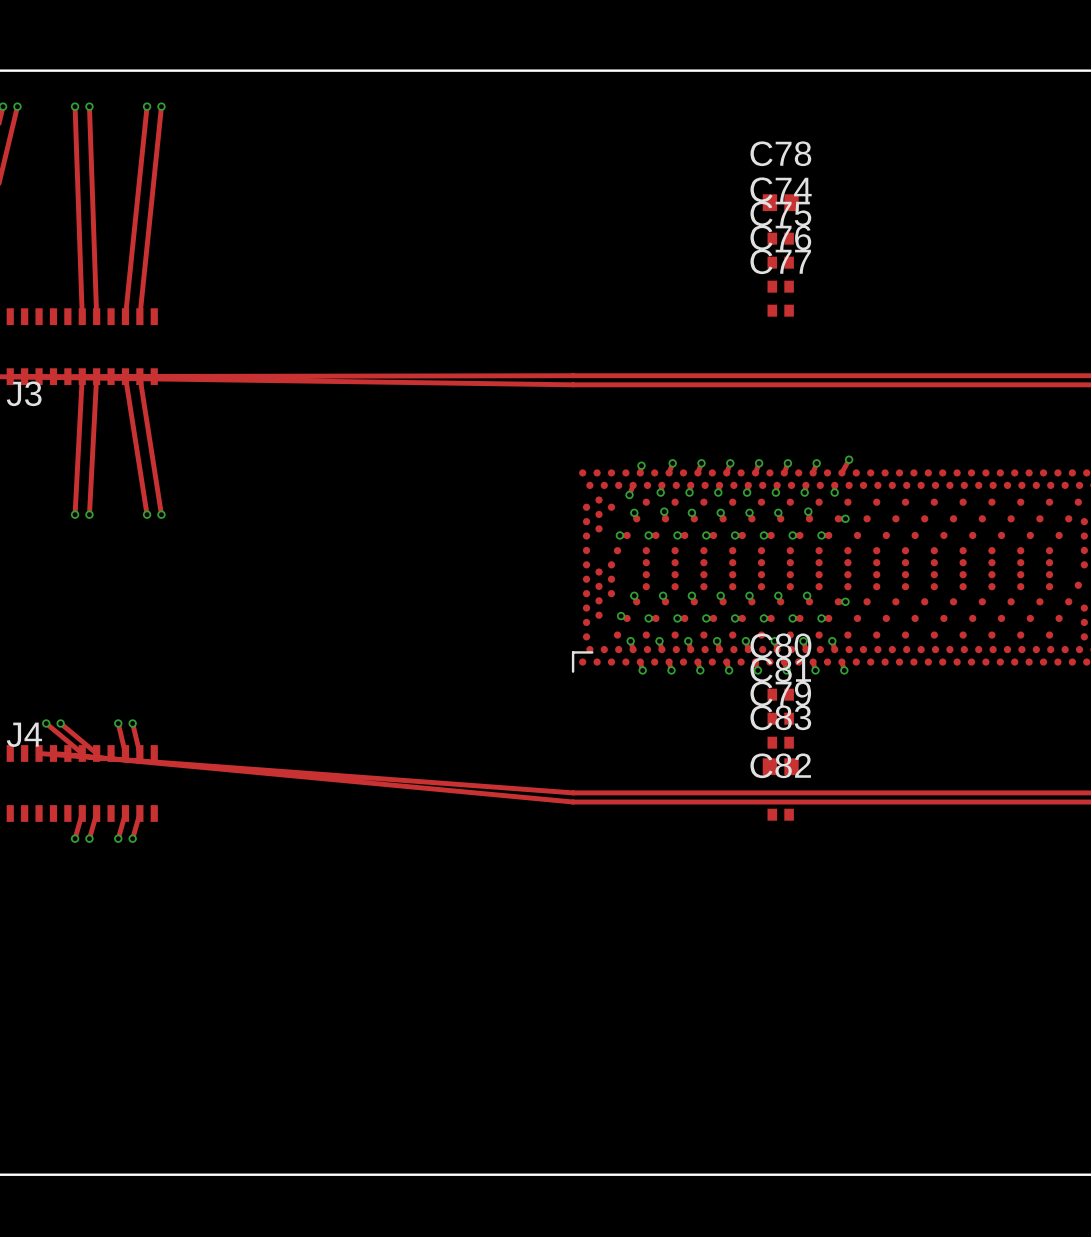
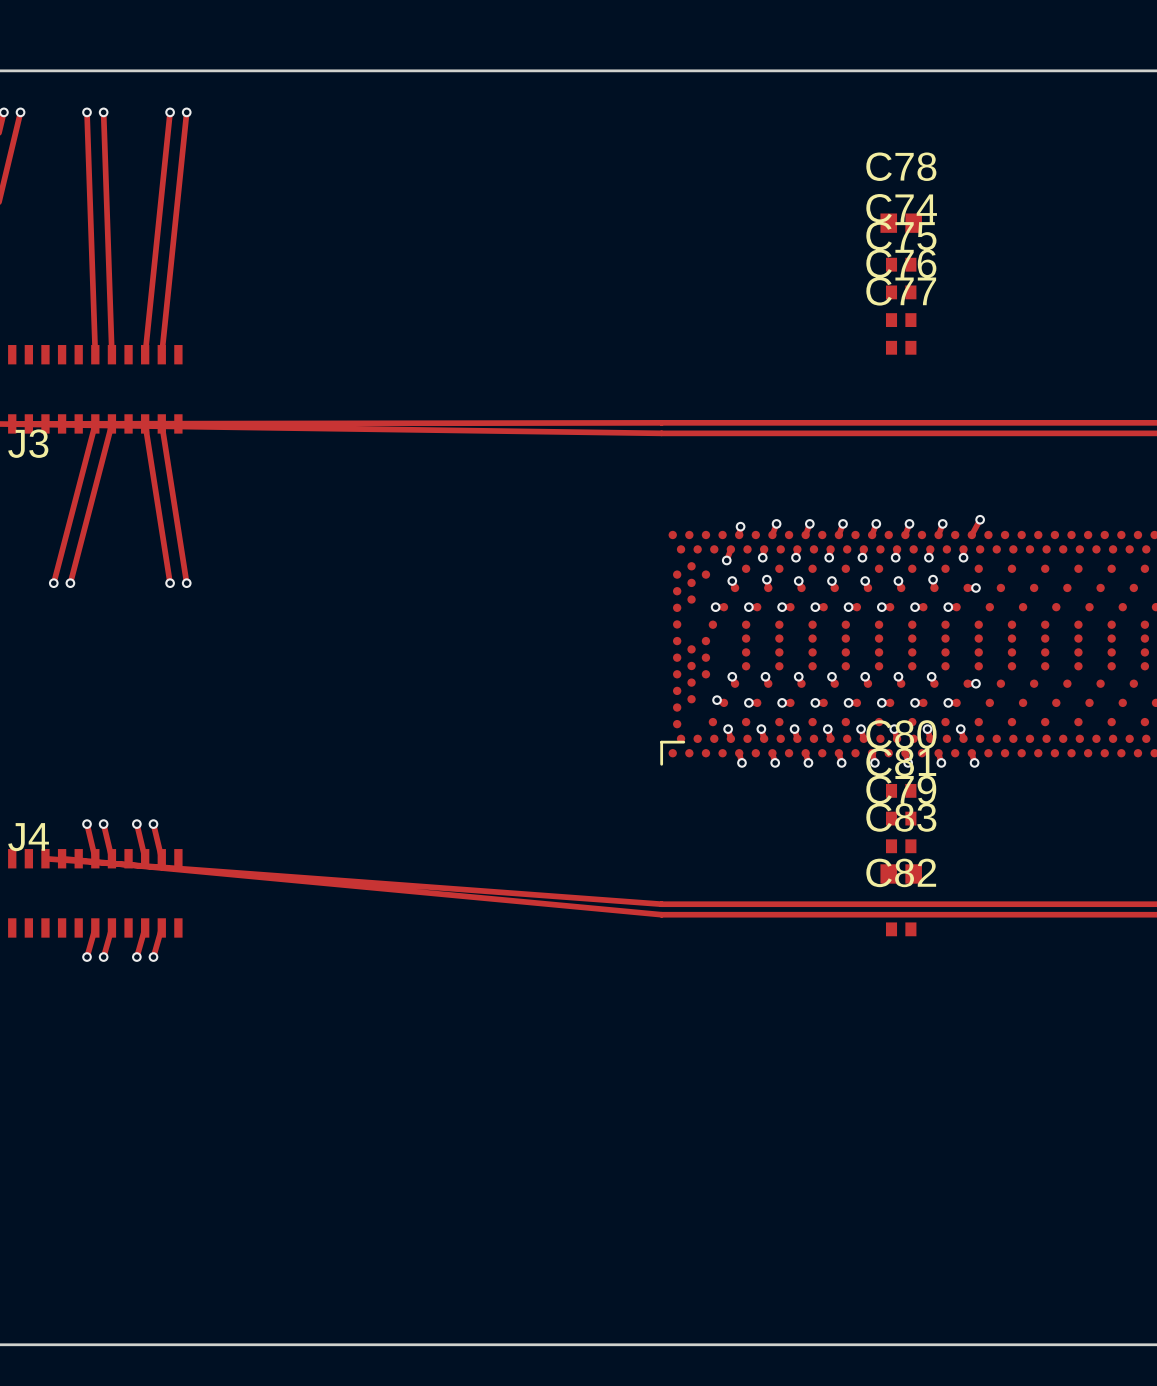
track: (82, 376) (75, 514) -> (95, 423) (53, 583)
track: (96, 376) (89, 514) -> (111, 423) (70, 583)
via: none -> (53, 583)
via: none -> (70, 583)
via: (75, 514) -> none
via: (89, 514) -> none
track: (46, 723) (82, 753) -> (87, 824) (95, 858)
via: (46, 723) -> none
track: (60, 723) (96, 753) -> (103, 824) (111, 858)
via: (60, 723) -> none
via: none -> (87, 824)
via: none -> (103, 824)

